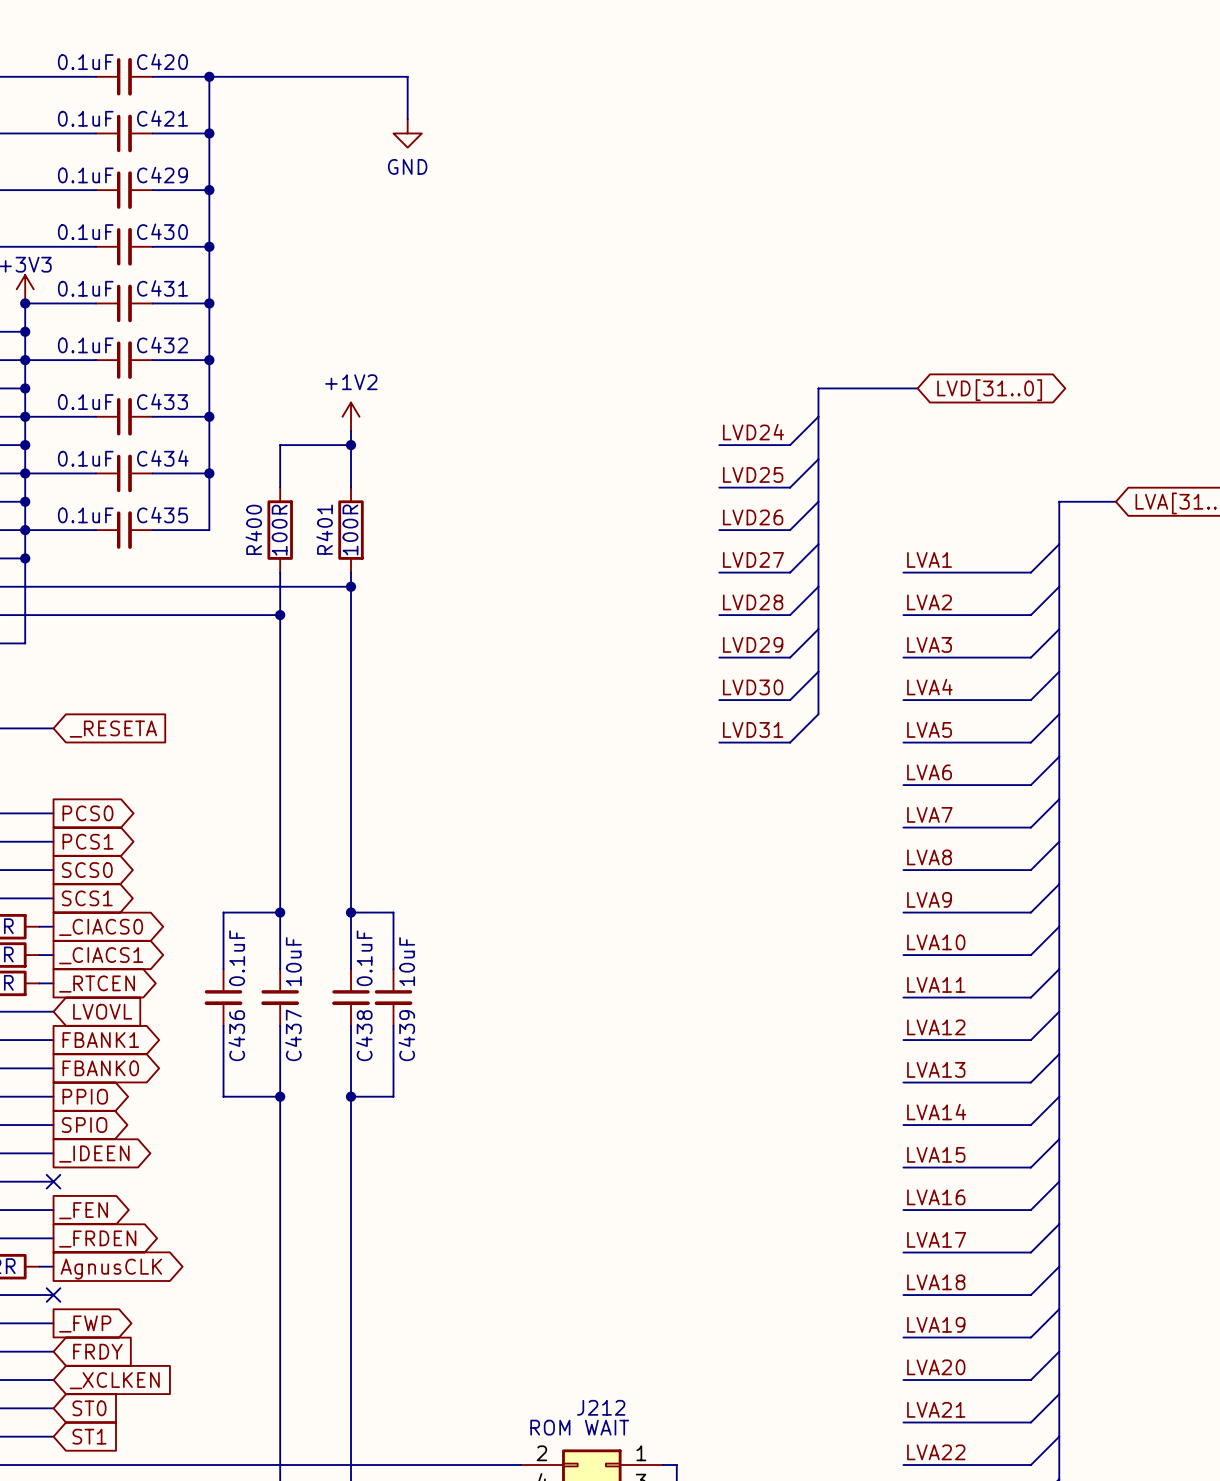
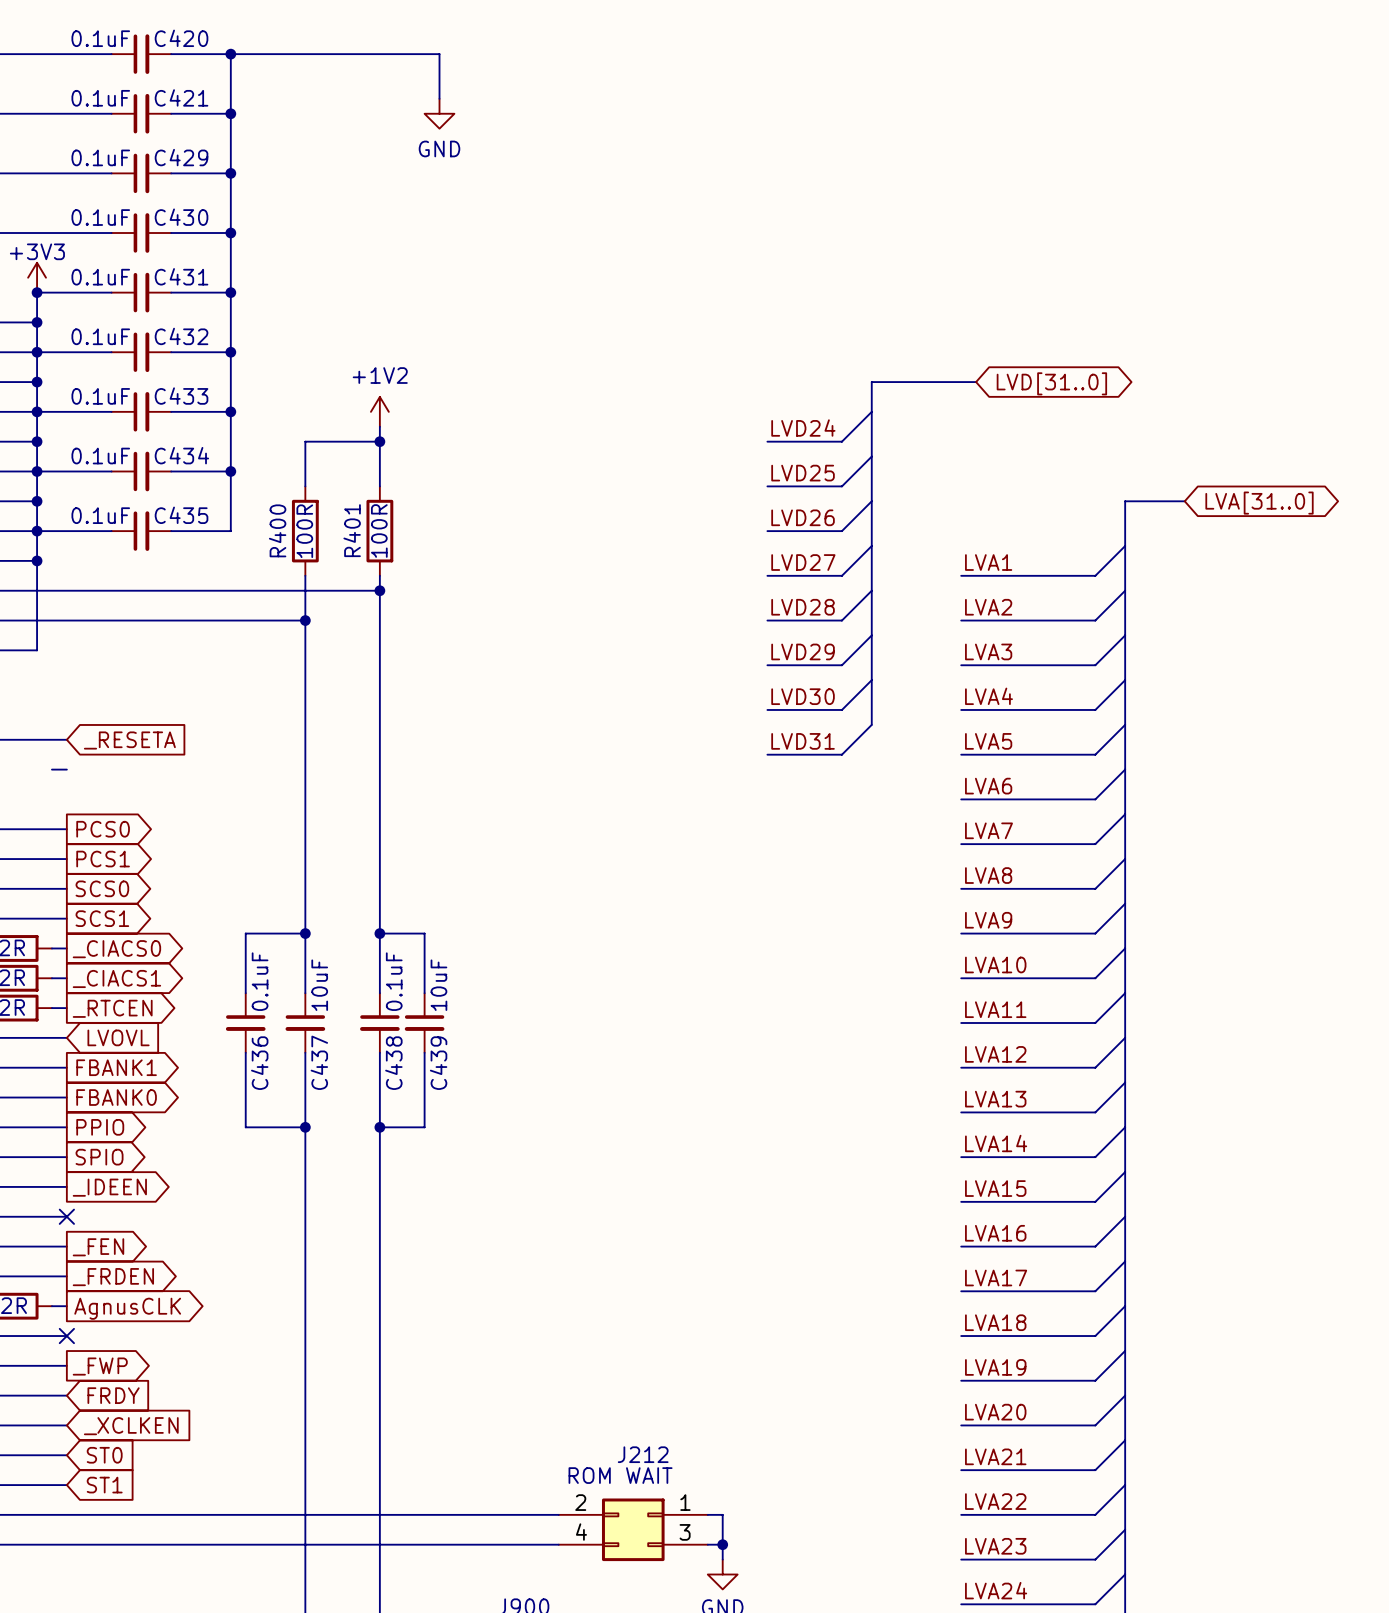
wire: none -> (51, 769) (66, 769)

